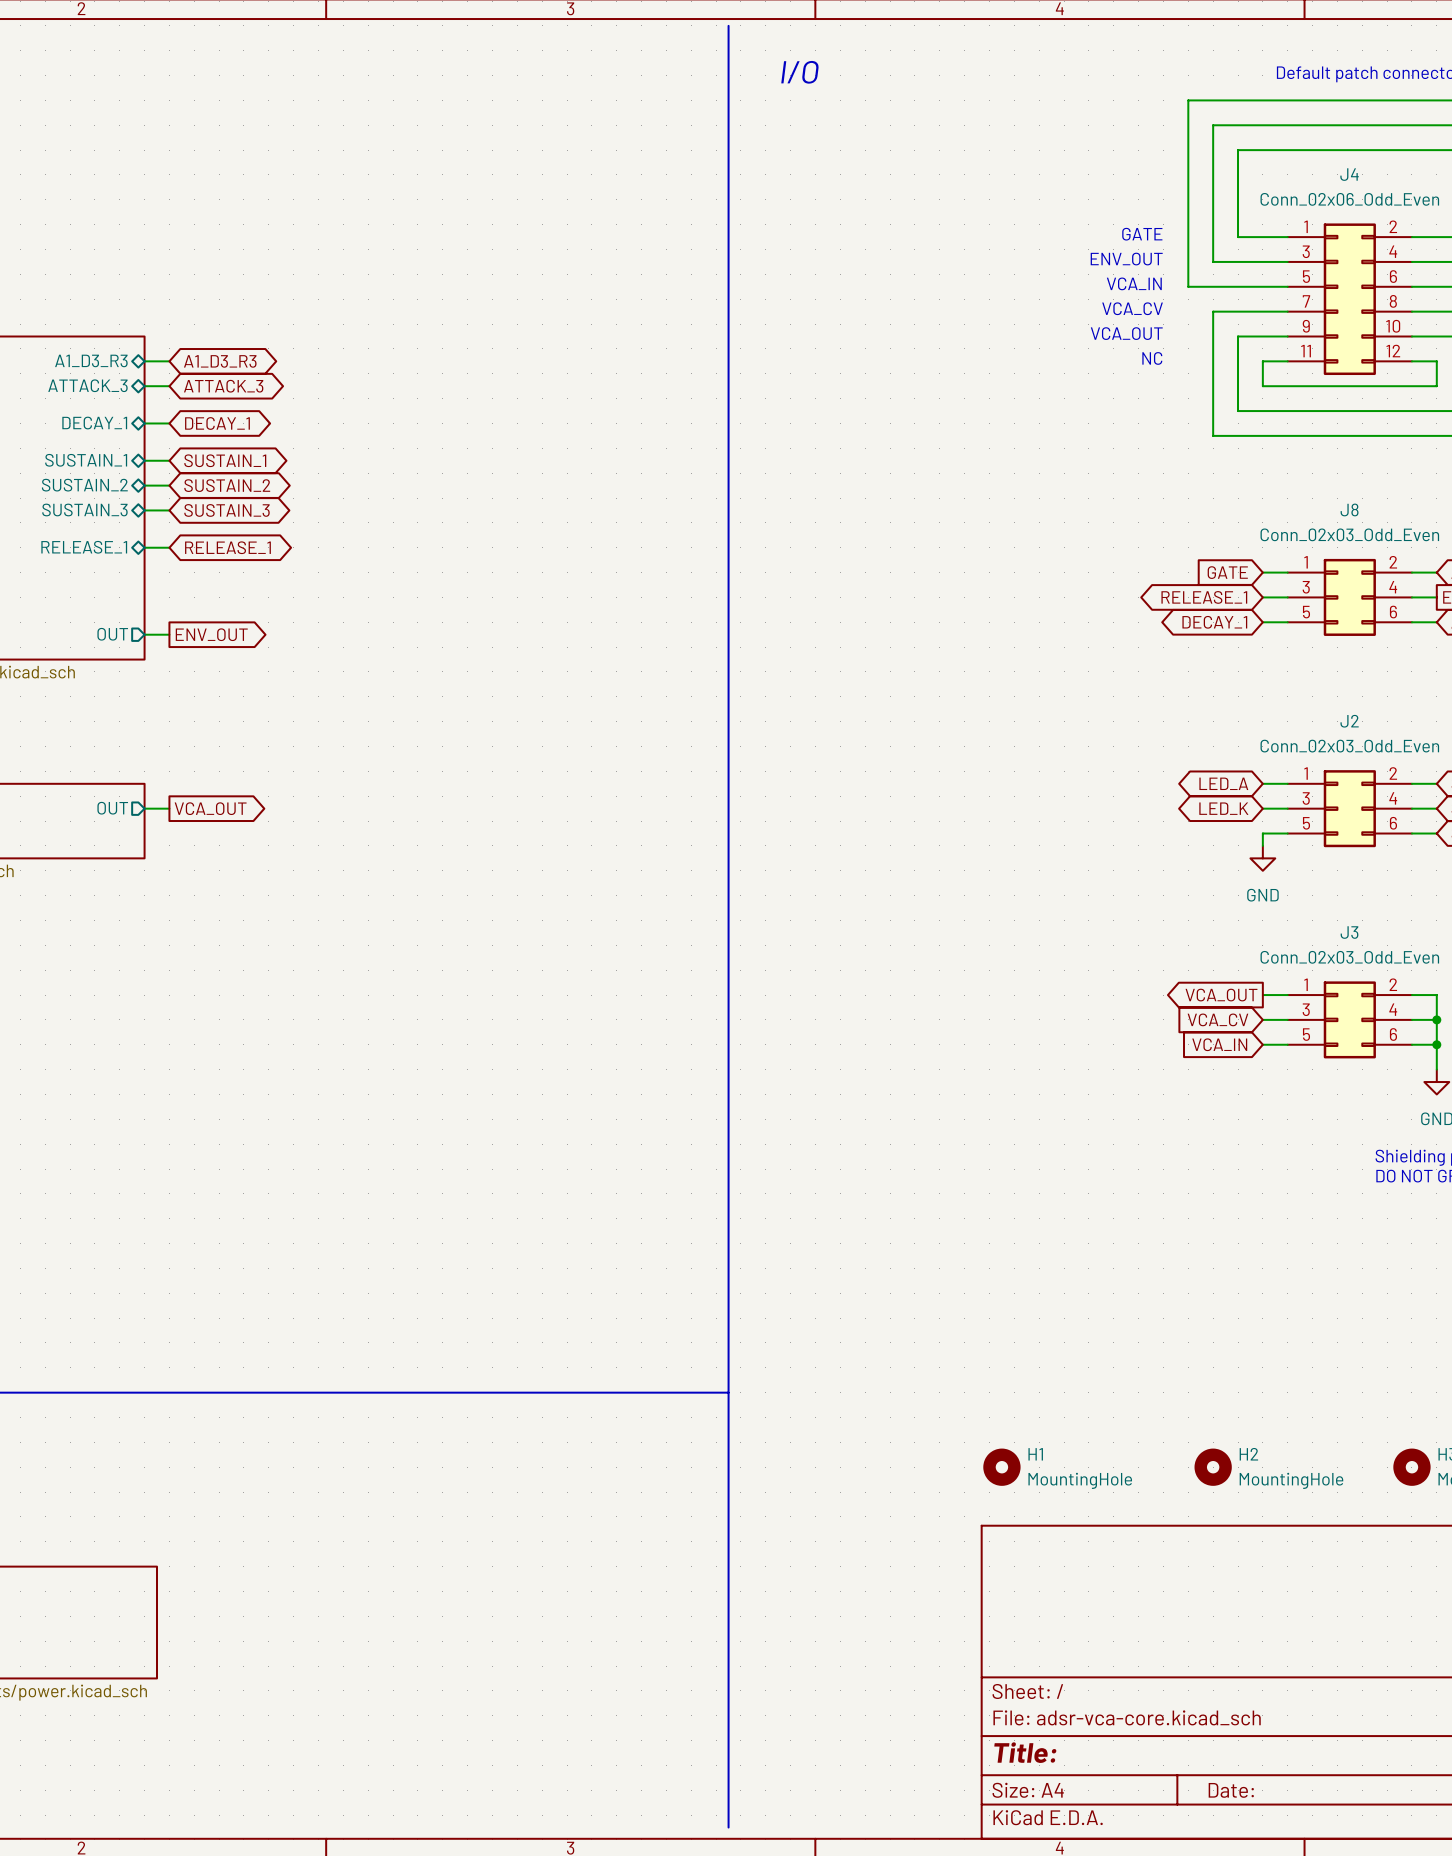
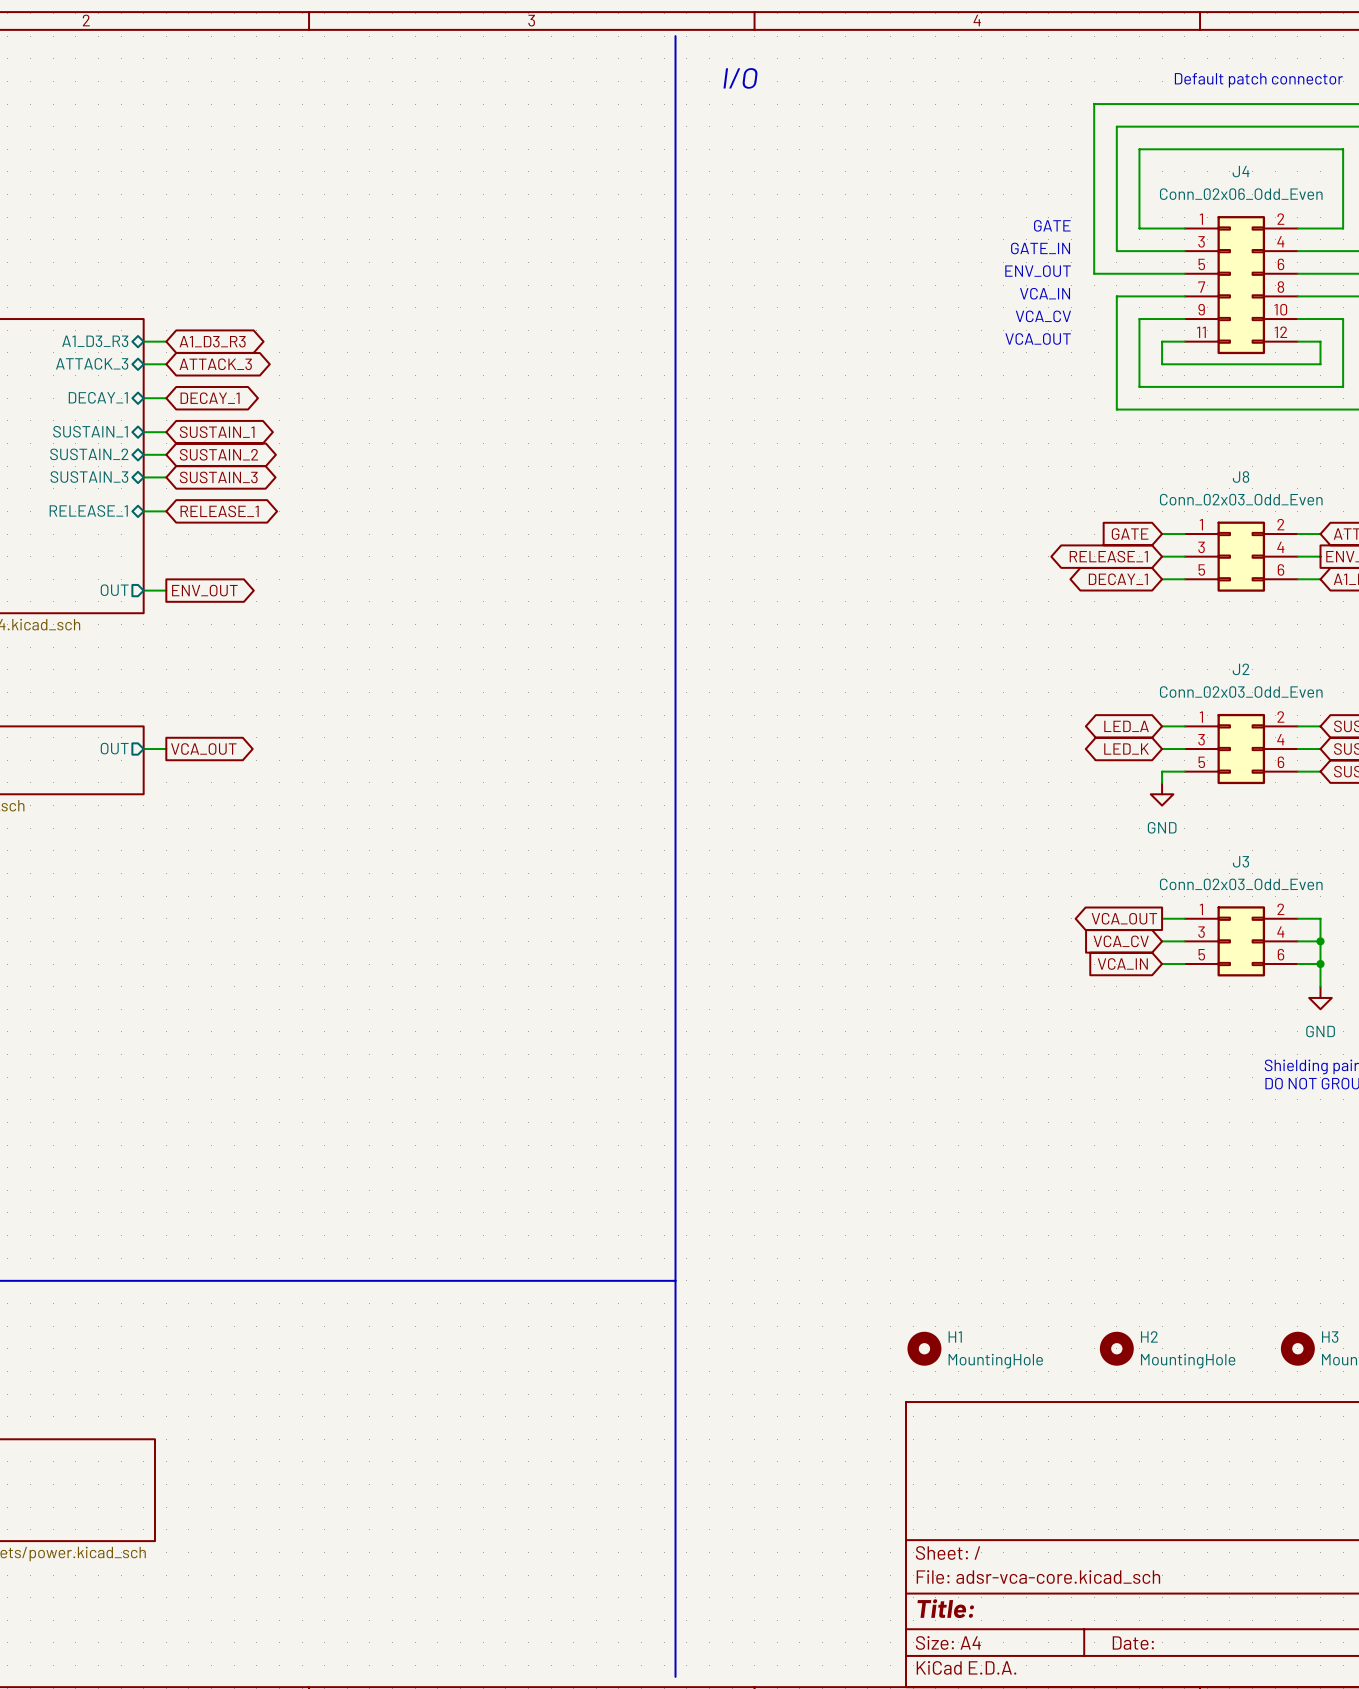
text: ENV_OUT (1126, 259) -> GATE_IN (1040, 248)
text: VCA_IN (1134, 283) -> ENV_OUT (1038, 271)
text: VCA_CV (1132, 308) -> VCA_IN (1045, 293)
text: VCA_OUT (1126, 333) -> VCA_CV (1043, 316)
text: NC (1152, 358) -> VCA_OUT (1038, 339)

